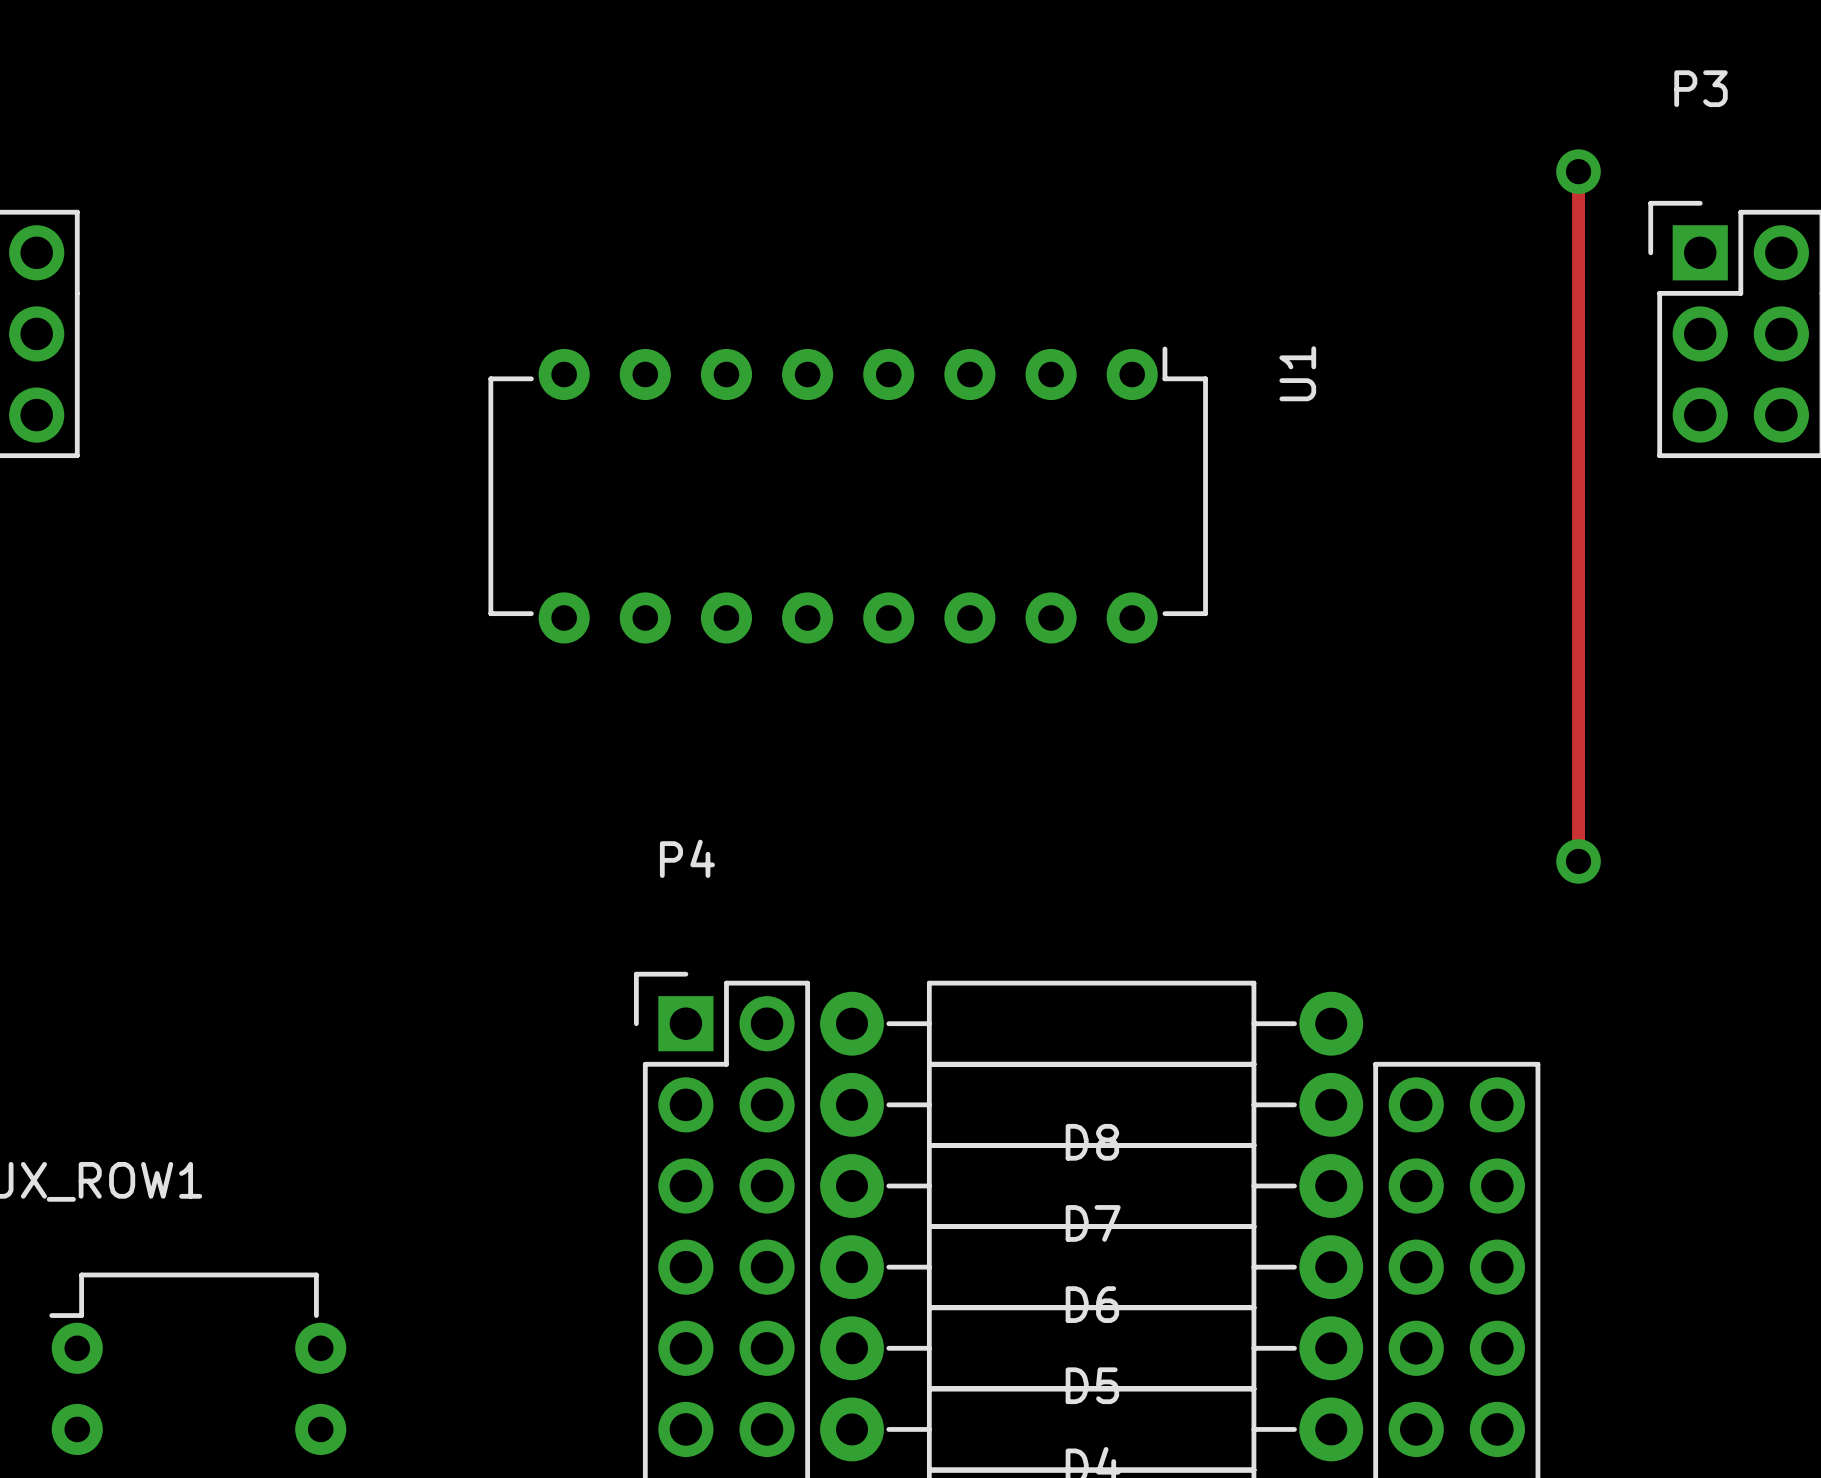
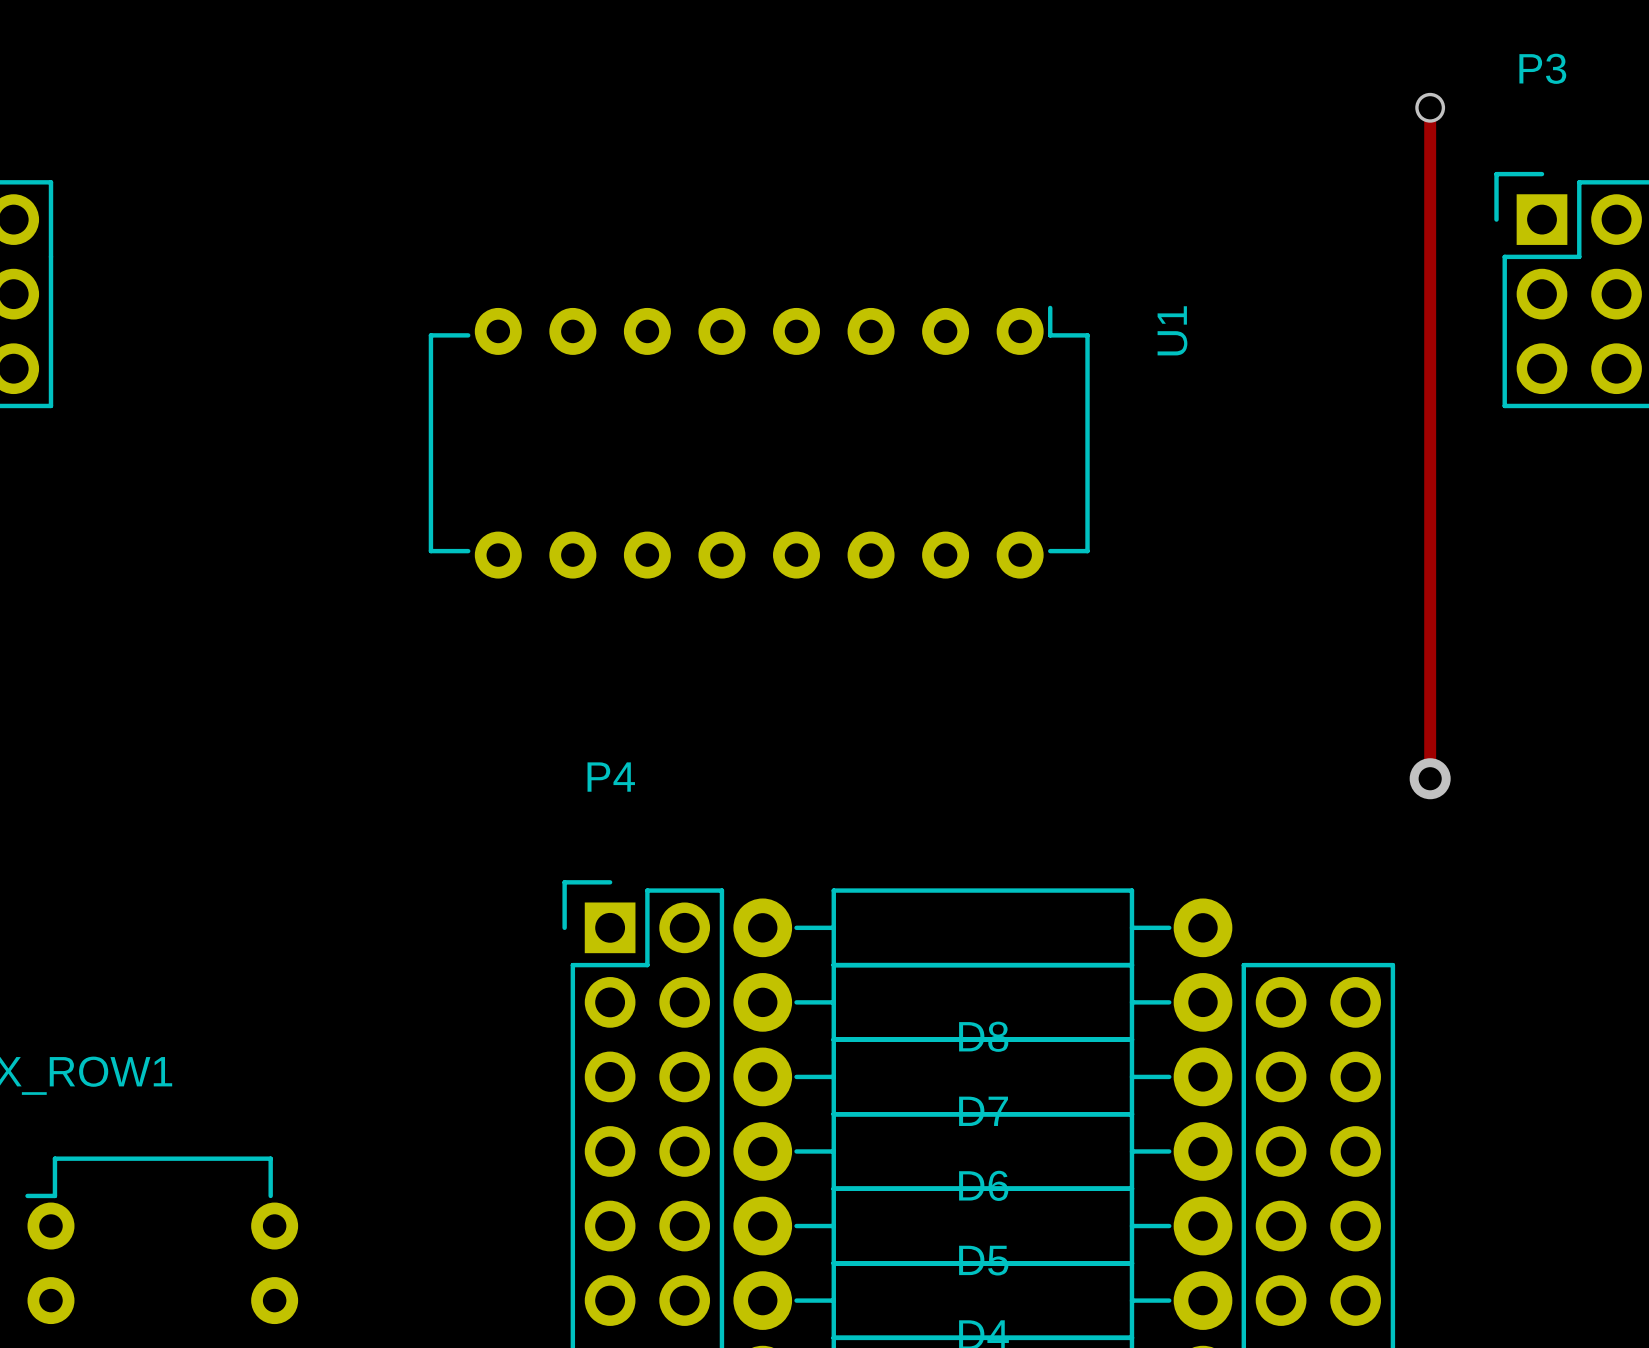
track: none -> (1430, 107) (1430, 145)
via: none -> (1430, 107)
via: (1578, 171) -> none

